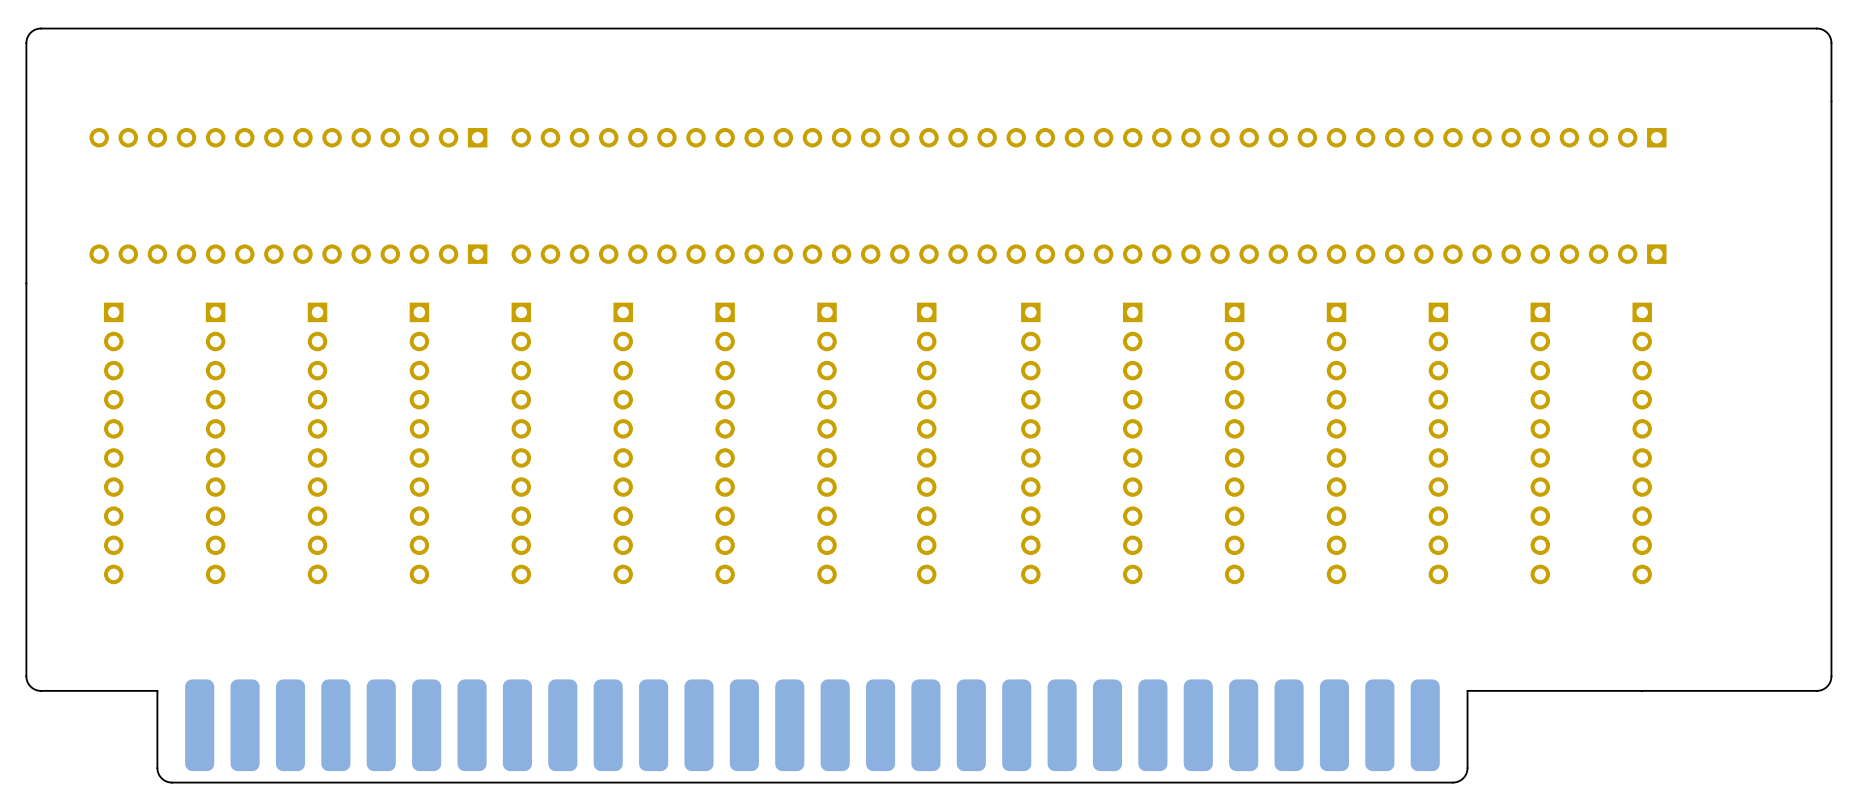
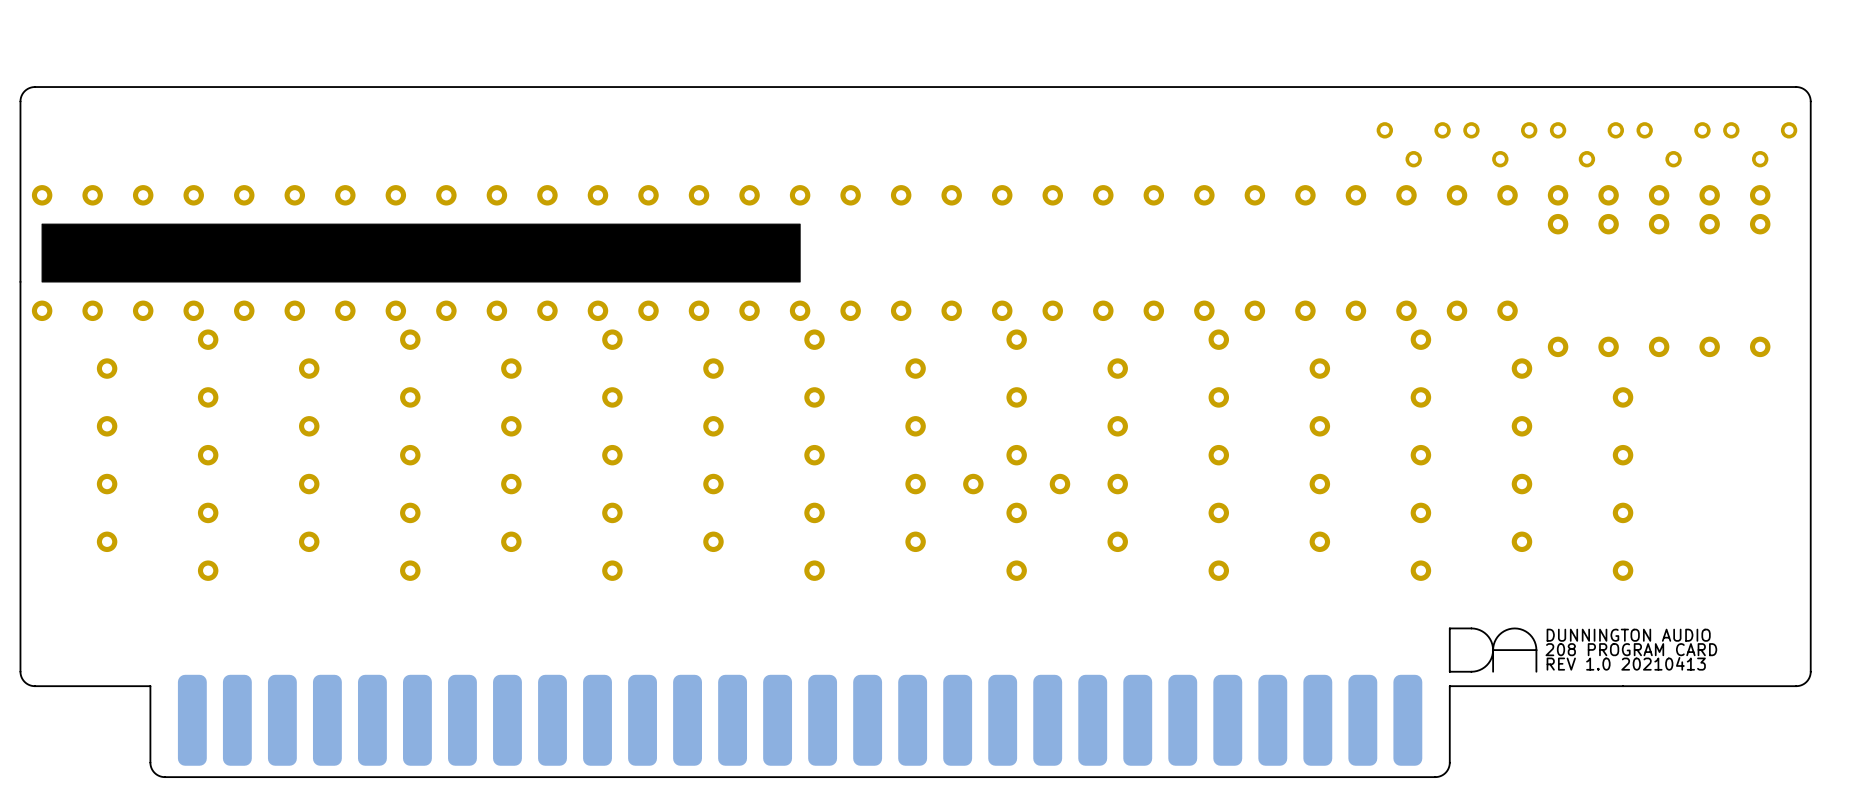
board edge: (1831, 101) (1831, 39) (1825, 31) (1816, 28) (40, 28) (31, 31) (26, 39) (26, 101) -> (1810, 101) (1806, 91) (1796, 87) (34, 87) (24, 91) (20, 101)
part: (288, 137) -> none
part: (1089, 137) -> none
part: none -> (1413, 144)
part: none -> (1500, 144)
part: none -> (1586, 144)
part: none -> (1673, 144)
part: none -> (1760, 144)
part: none -> (42, 195)
part: none -> (92, 195)
part: none -> (143, 195)
part: none -> (193, 195)
part: none -> (244, 195)
part: none -> (294, 195)
part: none -> (345, 195)
part: none -> (395, 195)
part: none -> (446, 195)
part: none -> (496, 195)
part: none -> (547, 195)
part: none -> (597, 195)
part: none -> (648, 195)
part: none -> (699, 195)
part: none -> (749, 195)
part: none -> (800, 195)
part: none -> (850, 195)
part: none -> (901, 195)
part: none -> (951, 195)
part: none -> (1002, 195)
part: none -> (1052, 195)
part: none -> (1103, 195)
part: none -> (1153, 195)
part: none -> (1204, 195)
part: none -> (1254, 195)
part: none -> (1305, 195)
part: none -> (1355, 195)
part: none -> (1406, 195)
part: none -> (1457, 195)
part: none -> (1507, 195)
part: none -> (1558, 195)
part: none -> (1608, 195)
part: none -> (1659, 195)
part: none -> (1709, 195)
part: none -> (1760, 195)
drawing: none -> [41, 223, 801, 283]
part: none -> (1558, 224)
part: none -> (1608, 224)
part: none -> (1659, 224)
part: none -> (1709, 224)
part: none -> (1760, 224)
part: (288, 254) -> none
part: (1089, 254) -> none
part: none -> (42, 310)
part: none -> (92, 310)
part: none -> (143, 310)
part: none -> (193, 310)
part: none -> (244, 310)
part: none -> (294, 310)
part: none -> (345, 310)
part: none -> (395, 310)
part: none -> (446, 310)
part: none -> (496, 310)
part: none -> (547, 310)
part: none -> (597, 310)
part: none -> (648, 310)
part: none -> (699, 310)
part: none -> (749, 310)
part: none -> (800, 310)
part: none -> (850, 310)
part: none -> (901, 310)
part: none -> (951, 310)
part: none -> (1002, 310)
part: none -> (1052, 310)
part: none -> (1103, 310)
part: none -> (1153, 310)
part: none -> (1204, 310)
part: none -> (1254, 310)
part: none -> (1305, 310)
part: none -> (1355, 310)
part: none -> (1406, 310)
part: none -> (1457, 310)
part: none -> (1507, 310)
part: none -> (208, 339)
part: none -> (410, 339)
part: none -> (612, 339)
part: none -> (814, 339)
part: none -> (1016, 339)
part: none -> (1218, 339)
part: none -> (1420, 339)
part: none -> (1558, 346)
part: none -> (1608, 346)
part: none -> (1659, 346)
part: none -> (1709, 346)
part: none -> (1760, 346)
part: none -> (107, 368)
part: none -> (309, 368)
part: none -> (511, 368)
part: none -> (713, 368)
part: none -> (915, 368)
part: none -> (1117, 368)
part: none -> (1319, 368)
part: none -> (1521, 368)
part: none -> (208, 397)
part: none -> (410, 397)
part: none -> (612, 397)
part: none -> (814, 397)
part: none -> (1016, 397)
part: none -> (1218, 397)
part: none -> (1420, 397)
part: none -> (1623, 397)
part: none -> (107, 426)
part: none -> (309, 426)
part: none -> (511, 426)
part: none -> (713, 426)
part: none -> (915, 426)
part: none -> (1117, 426)
part: none -> (1319, 426)
part: none -> (1521, 426)
part: (113, 443) -> none
part: (215, 443) -> none
part: (317, 443) -> none
part: (419, 443) -> none
part: (521, 443) -> none
part: (623, 443) -> none
part: (725, 443) -> none
part: (827, 443) -> none
part: (926, 443) -> none
part: (1030, 443) -> none
part: (1132, 443) -> none
part: (1234, 443) -> none
part: (1336, 443) -> none
part: (1438, 443) -> none
part: (1540, 443) -> none
part: (1642, 443) -> none
part: none -> (208, 455)
part: none -> (410, 455)
part: none -> (612, 455)
part: none -> (814, 455)
part: none -> (1016, 455)
part: none -> (1218, 455)
part: none -> (1420, 455)
part: none -> (1623, 455)
part: none -> (107, 484)
part: none -> (309, 484)
part: none -> (511, 484)
part: none -> (713, 484)
part: none -> (915, 484)
part: none -> (973, 484)
part: none -> (1059, 484)
part: none -> (1117, 484)
part: none -> (1319, 484)
part: none -> (1521, 484)
part: none -> (208, 512)
part: none -> (410, 512)
part: none -> (612, 512)
part: none -> (814, 512)
part: none -> (1016, 512)
part: none -> (1218, 512)
part: none -> (1420, 512)
part: none -> (1623, 512)
part: none -> (107, 541)
part: none -> (309, 541)
part: none -> (511, 541)
part: none -> (713, 541)
part: none -> (915, 541)
part: none -> (1117, 541)
part: none -> (1319, 541)
part: none -> (1521, 541)
part: none -> (208, 570)
part: none -> (410, 570)
part: none -> (612, 570)
part: none -> (814, 570)
part: none -> (1016, 570)
part: none -> (1218, 570)
part: none -> (1420, 570)
part: none -> (1623, 570)
drawing: none -> [1449, 627, 1538, 673]

